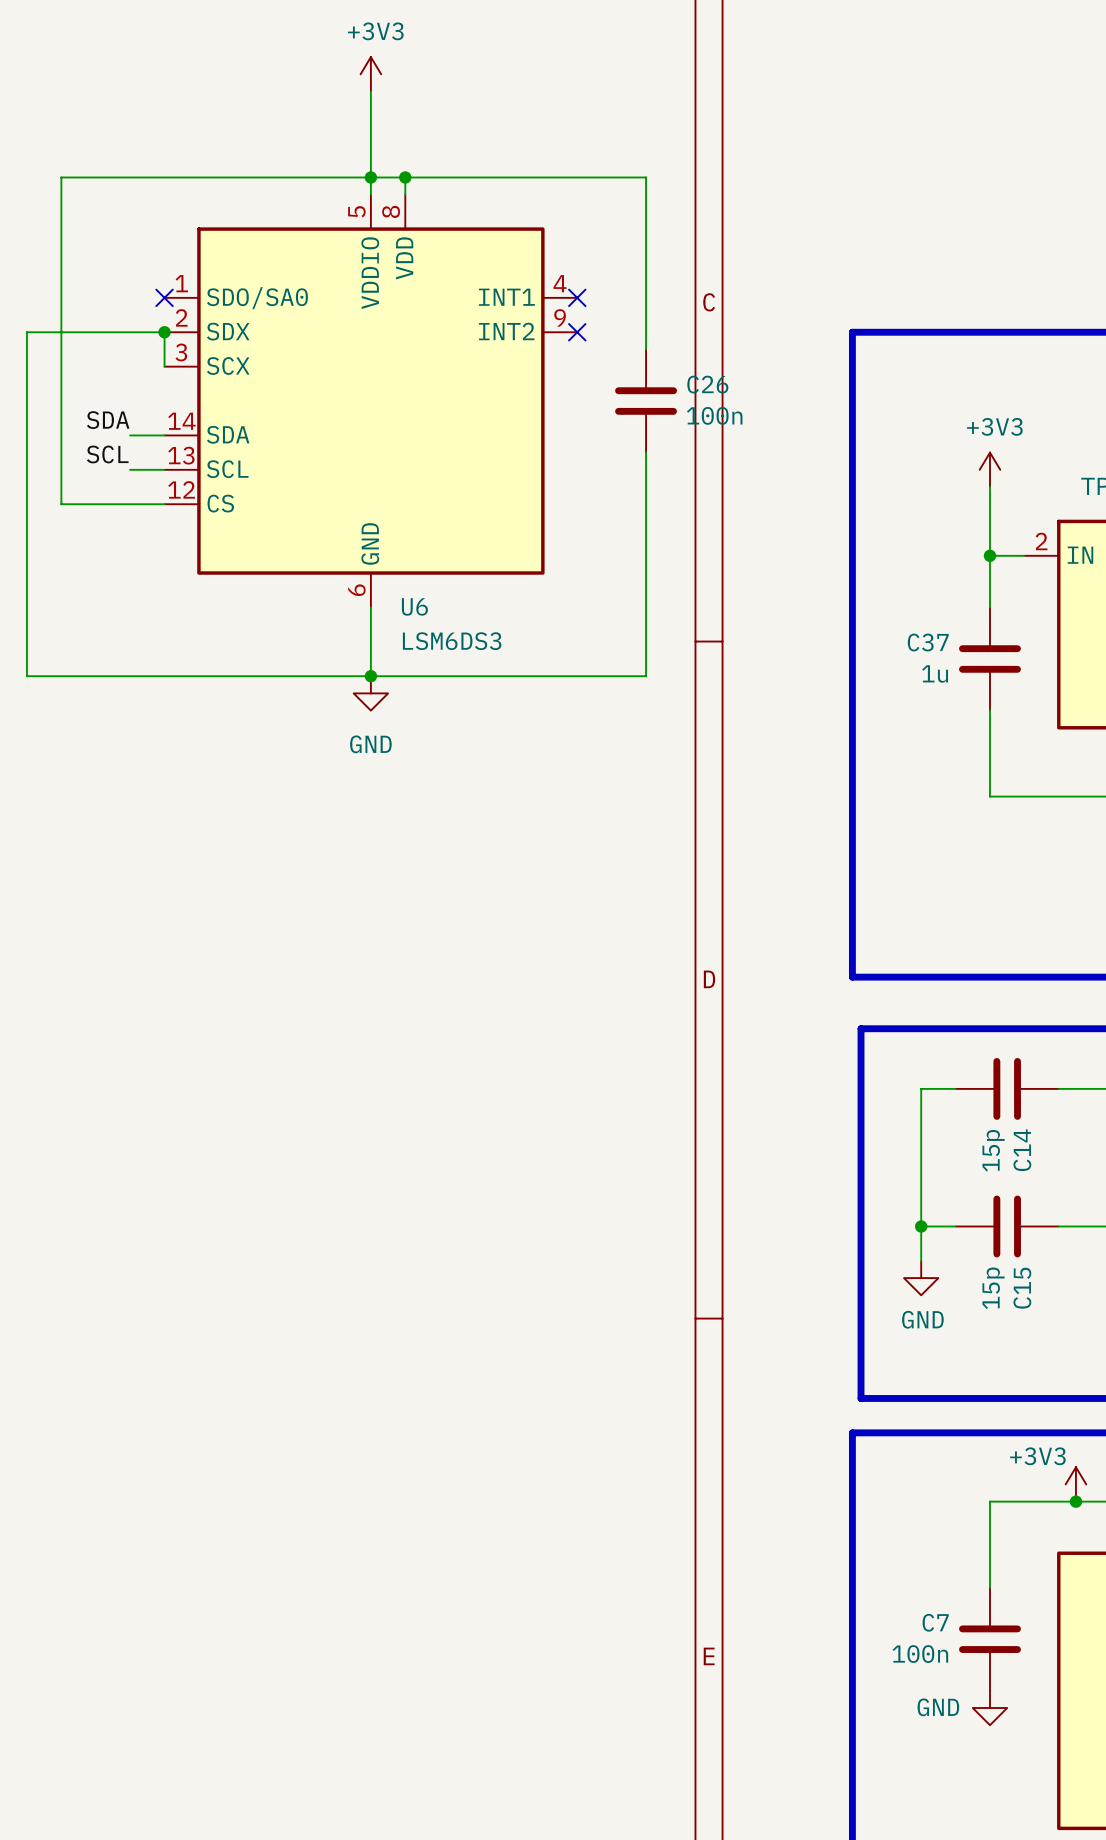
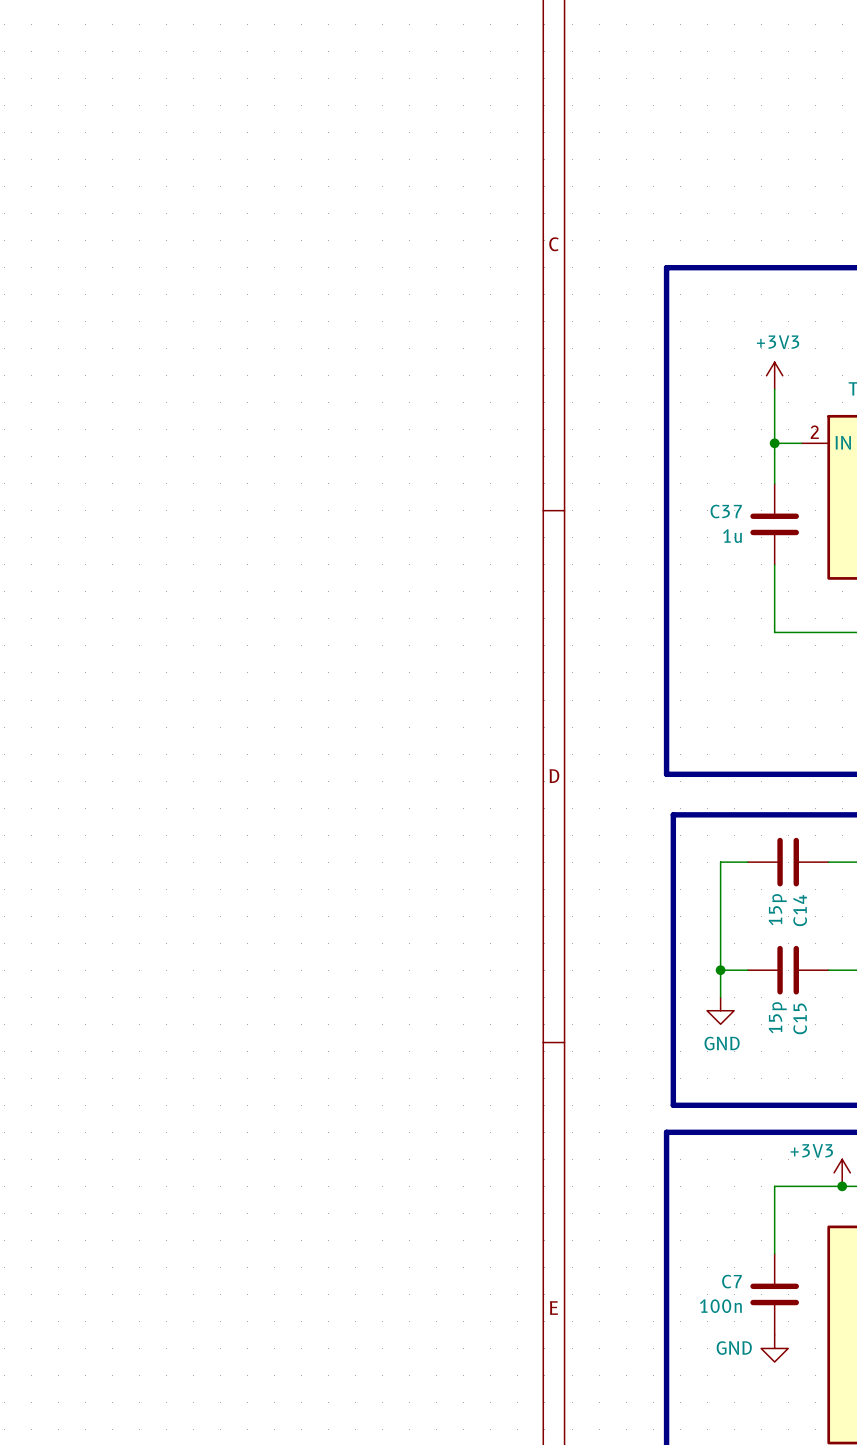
power symbol: +3V3 (370, 74) -> none
wire: (370, 91) (370, 194) -> none
junction: (370, 177) -> none
wire: (405, 177) (405, 194) -> none
junction: (405, 177) -> none
no-connect mark: (164, 297) -> none
no-connect mark: (577, 297) -> none
junction: (164, 332) -> none
no-connect mark: (577, 332) -> none
wire: (646, 349) (646, 177) (61, 177) (61, 504) (164, 504) -> none
wire: (164, 366) (164, 332) (26, 332) (26, 676) (646, 676) (646, 452) -> none
U6: LSM6DS3 (370, 401) -> none
C26: 100n (646, 401) -> none
label: SDA (108, 420) -> none
wire: (130, 435) (164, 435) -> none
label: SCL (107, 454) -> none
wire: (130, 469) (164, 469) -> none
wire: (370, 607) (370, 676) -> none
junction: (370, 676) -> none
power symbol: GND (370, 693) -> none

